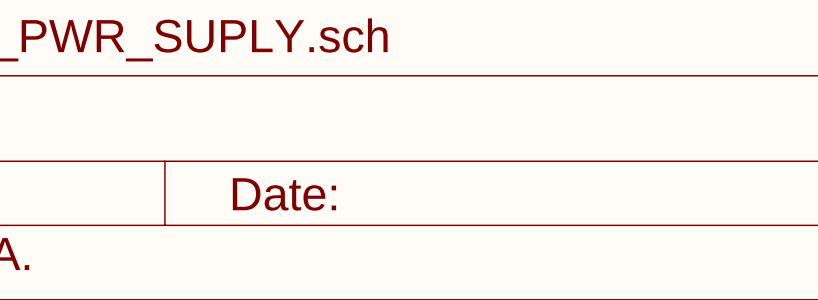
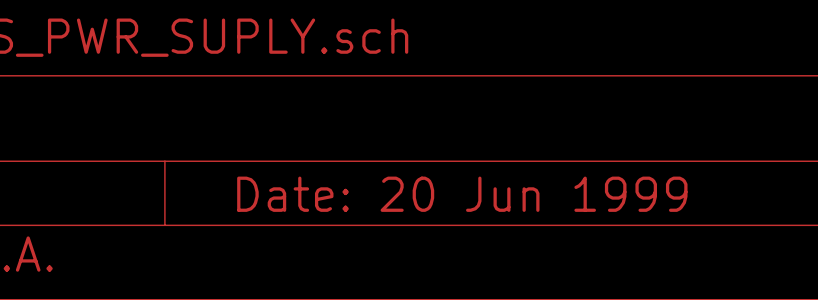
title block: Date: (284, 194) -> Date: 20 Jun 1999 (462, 194)

